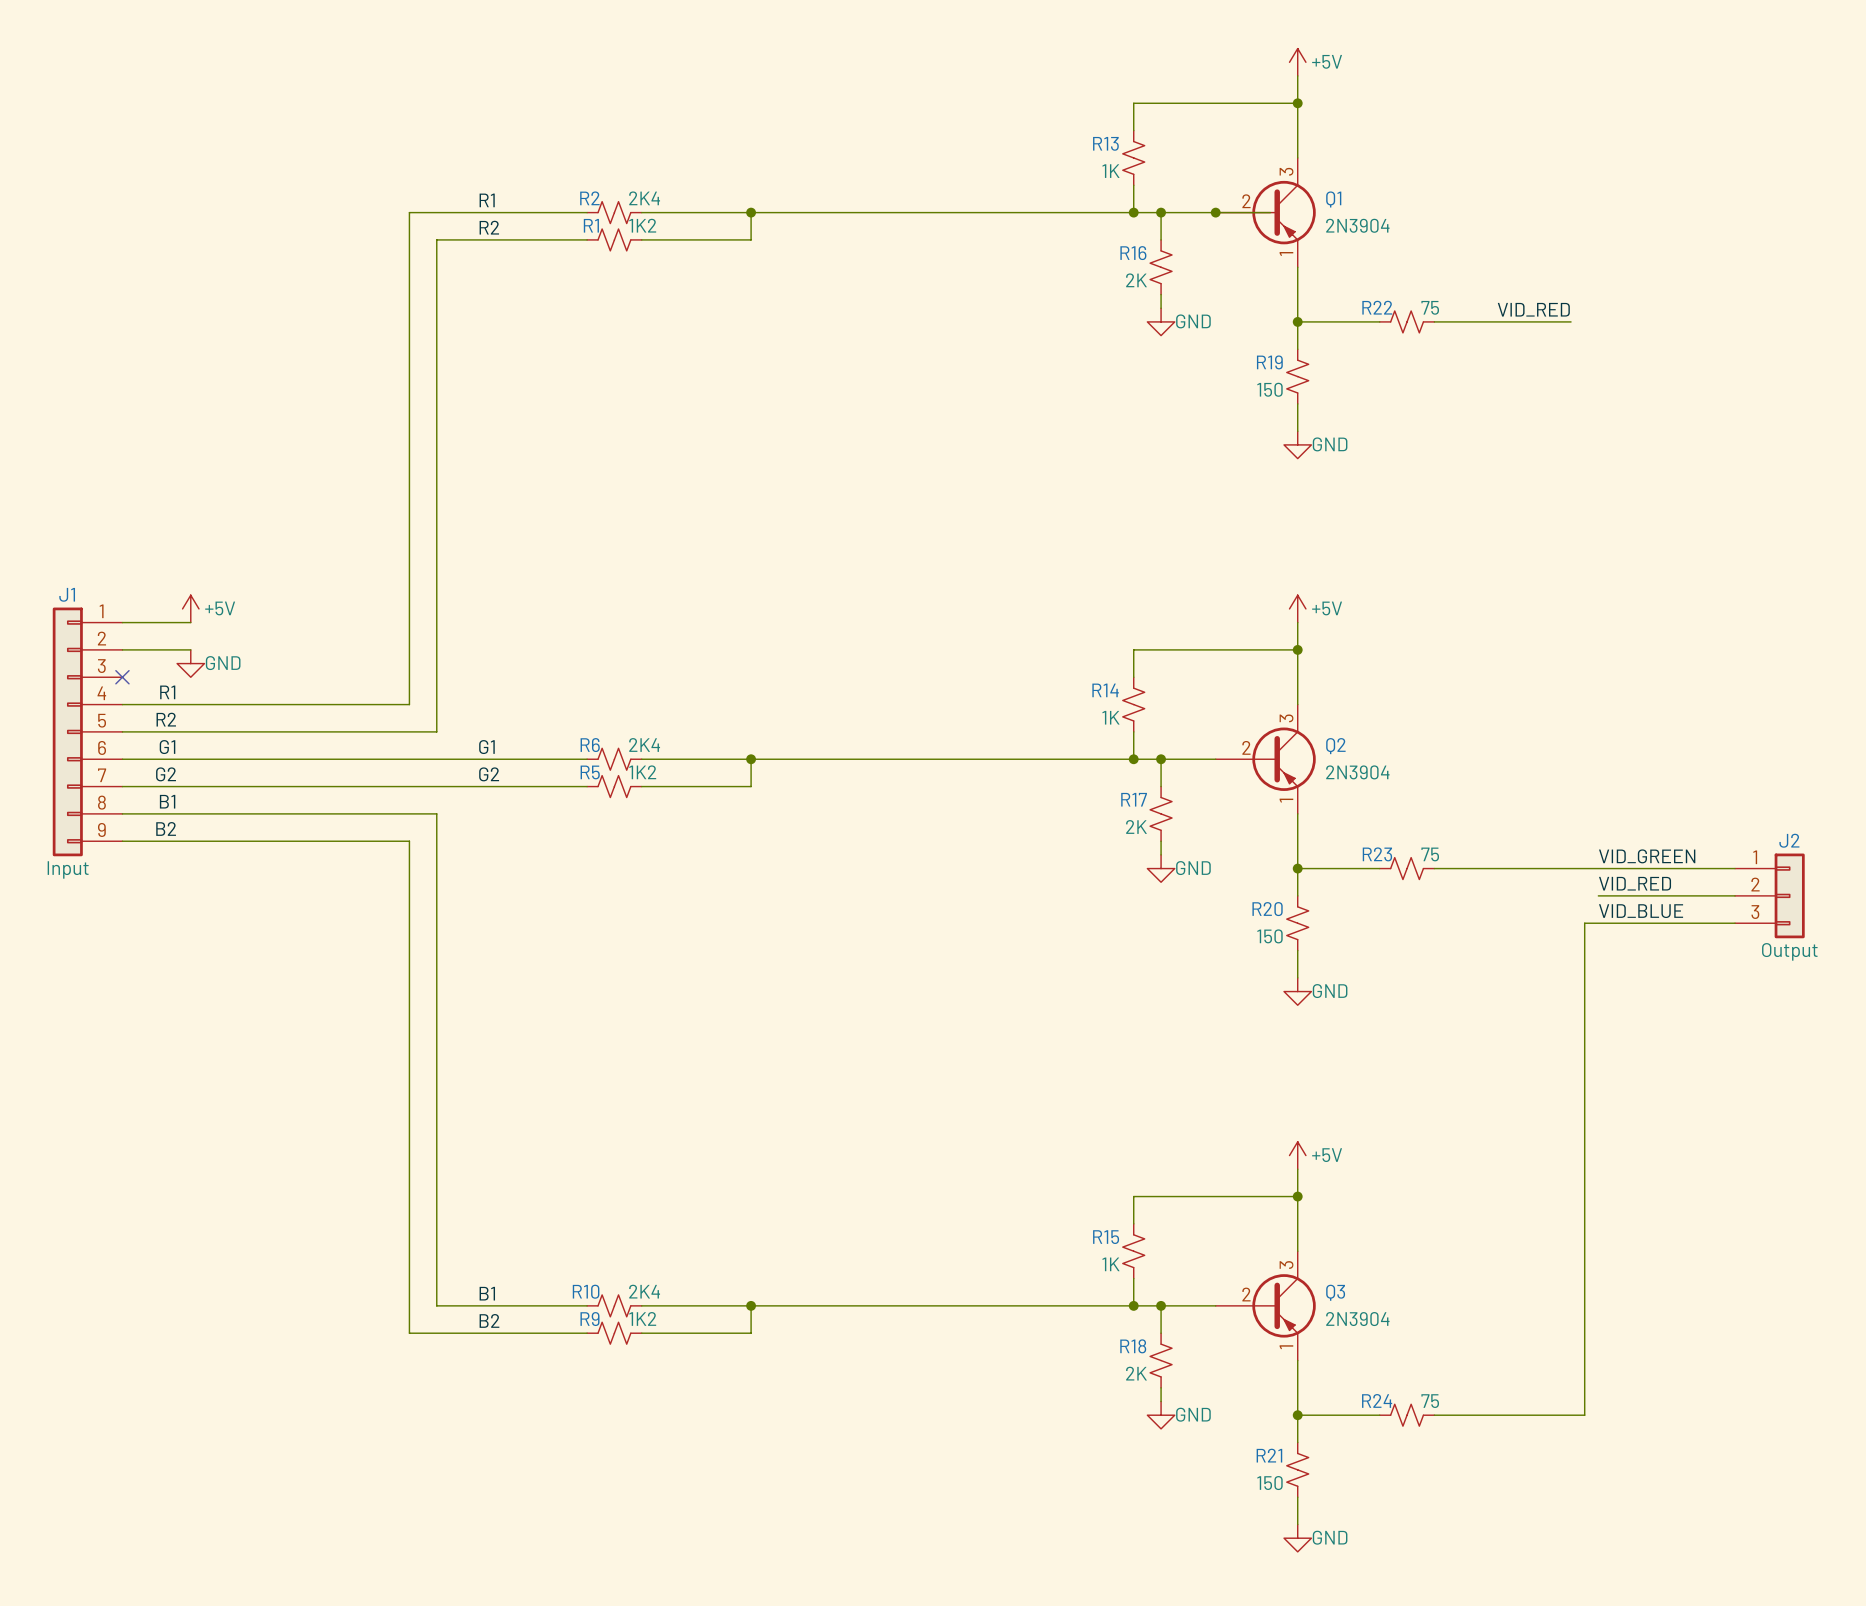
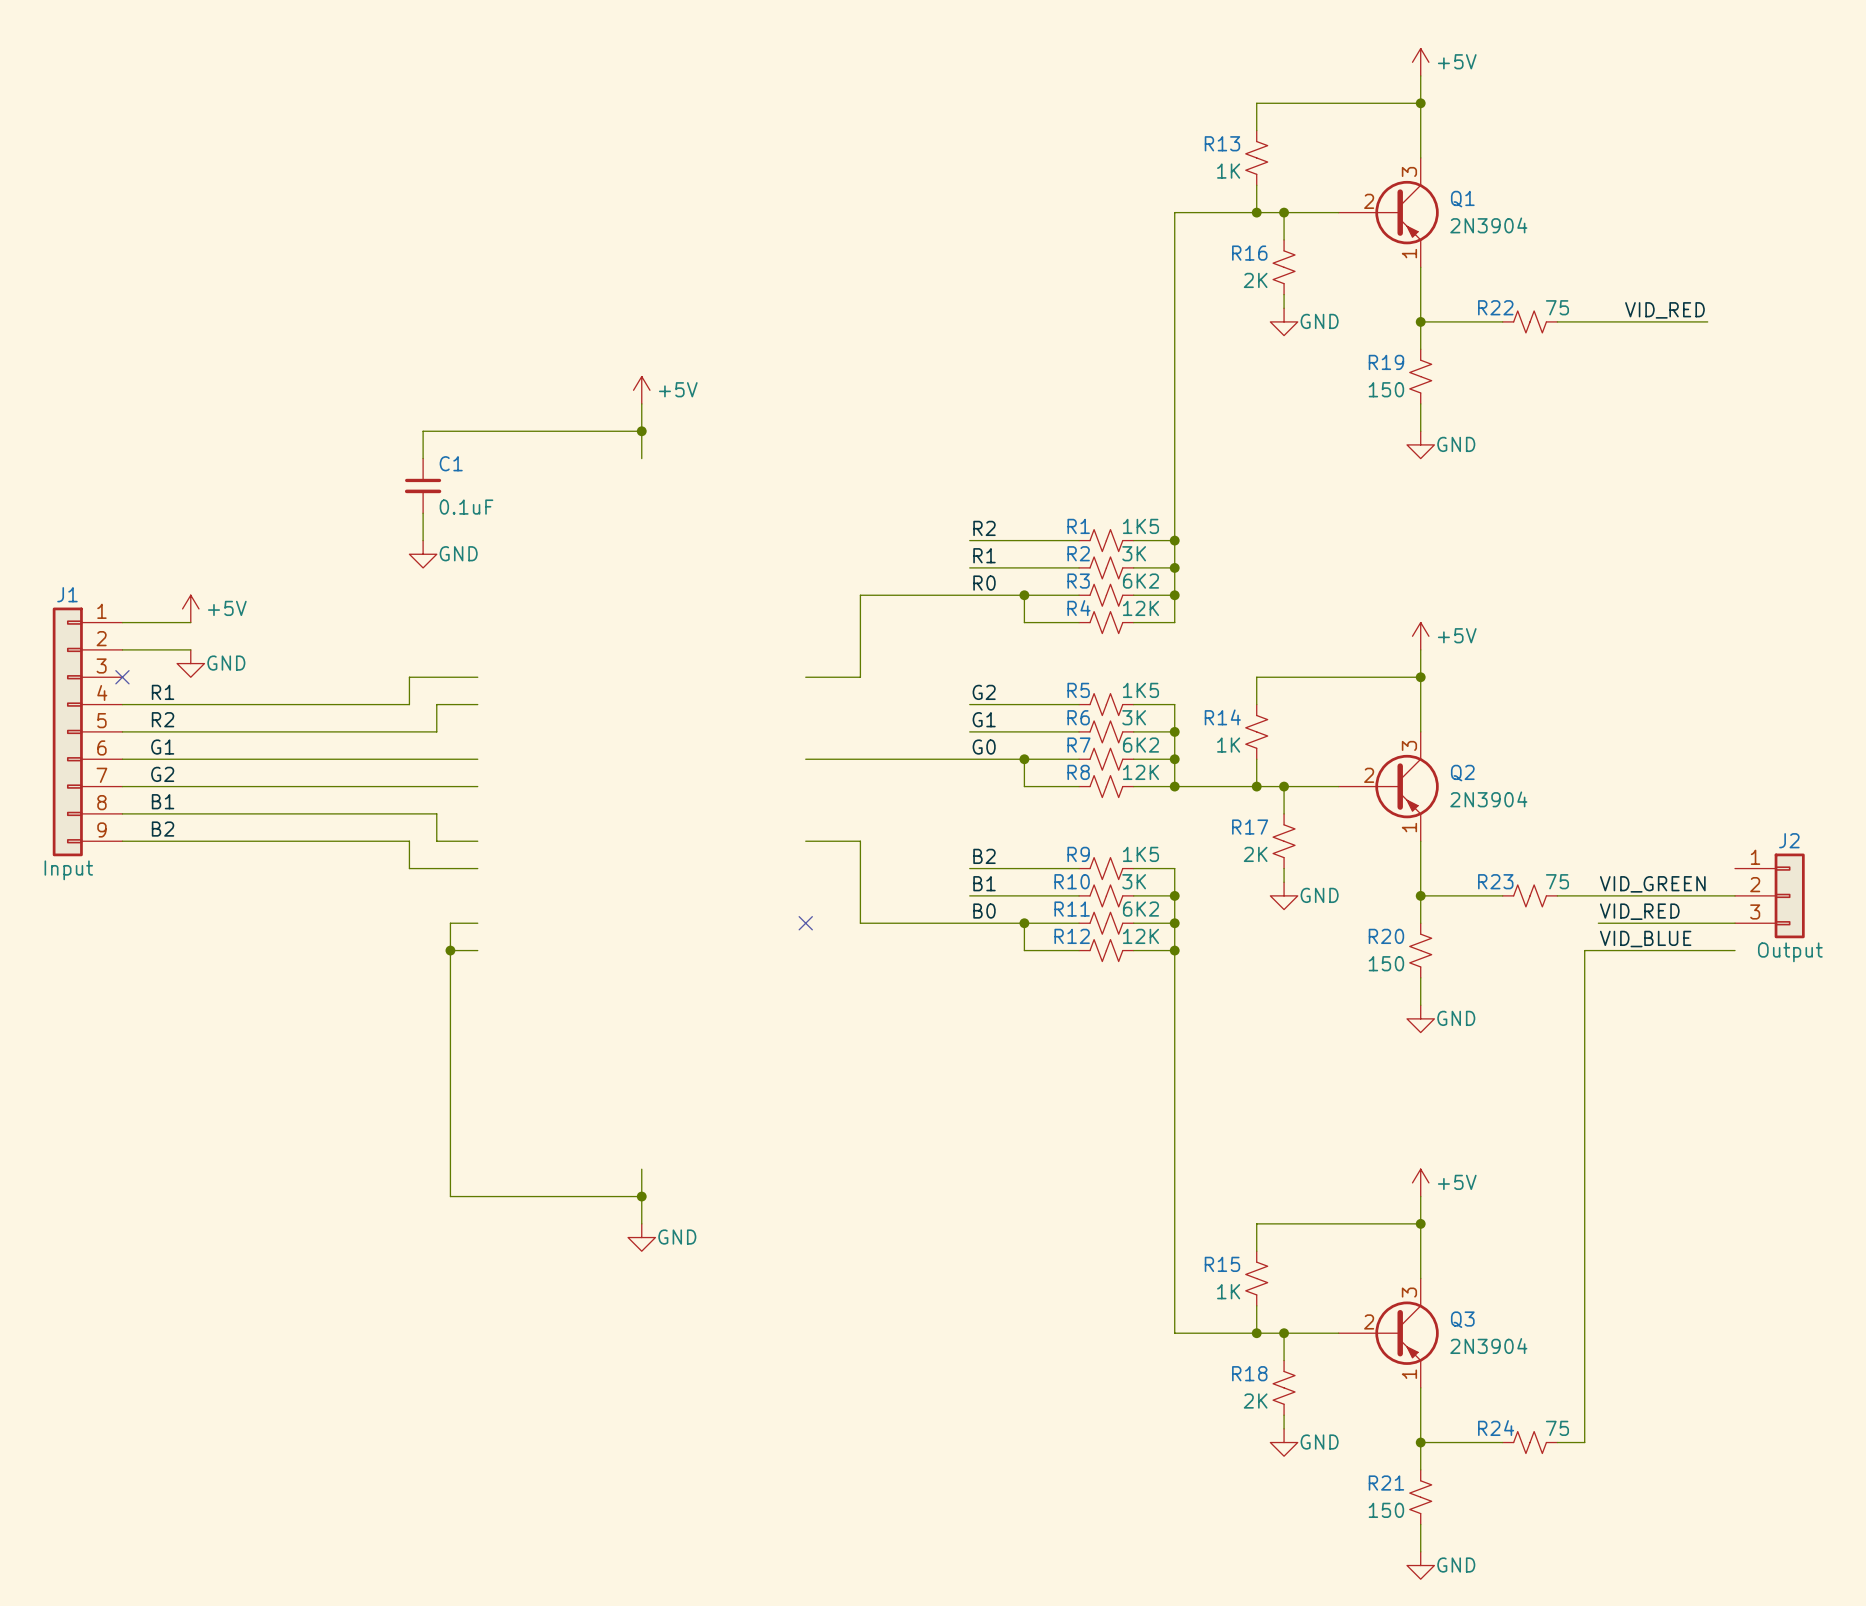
power symbol position: +5V (1297, 62) -> +5V (1420, 62)
wire: (1297, 75) (1297, 157) -> (1420, 75) (1420, 157)
wire: (1256, 103) (1133, 103) (1133, 130) -> (1256, 103) (1256, 130)
wire: none -> (1297, 103) (1420, 103)
junction: (1297, 103) -> none
junction: none -> (1420, 103)
R13 position: (1133, 157) -> (1256, 157)
wire: (1133, 185) (1133, 212) -> (1256, 185) (1256, 212)
R2 value: 2K4 (644, 198) -> 3K (1134, 553)
label: R1 (487, 200) -> none
wire: (587, 212) (409, 212) (409, 677) -> (477, 677) (409, 677)
R2 position: (614, 212) -> (1106, 567)
wire: (641, 212) (1174, 212) -> (1133, 622) (1174, 622) (1174, 212)
wire: (751, 212) (751, 239) (641, 239) -> none
junction: (751, 212) -> none
junction: (1133, 212) -> none
wire: (1161, 212) (1161, 239) -> (1284, 212) (1284, 239)
junction: (1161, 212) -> none
junction: (1215, 212) -> none
junction: none -> (1256, 212)
Q1 position: (1265, 212) -> (1388, 212)
wire: none -> (1270, 212) (1338, 212)
junction: none -> (1284, 212)
R1 value: 1K2 (642, 225) -> 1K5 (1140, 526)
label: R2 (489, 227) -> none
wire: (587, 239) (436, 239) (436, 704) -> (477, 704) (436, 704)
R1 position: (614, 239) -> (1106, 540)
R16 position: (1161, 267) -> (1284, 267)
wire: (1297, 267) (1297, 349) -> (1420, 267) (1420, 349)
wire: (1161, 294) (1161, 308) -> (1284, 294) (1284, 308)
label position: VID_RED (1533, 309) -> VID_RED (1664, 310)
power symbol: GND (1161, 321) -> none
power symbol: none -> GND (1284, 321)
wire: (1297, 321) (1379, 321) -> none
junction: (1297, 321) -> none
R22 position: (1407, 321) -> (1530, 321)
junction: none -> (1420, 321)
wire: none -> (1571, 321) (1707, 321)
R19 position: (1297, 376) -> (1420, 376)
power symbol: none -> +5V (641, 390)
wire: none -> (641, 403) (641, 458)
wire: (1297, 403) (1297, 431) -> (1420, 403) (1420, 431)
wire: none -> (641, 431) (423, 431) (423, 458)
junction: none -> (641, 431)
power symbol: GND (1297, 444) -> none
power symbol: none -> GND (1420, 444)
C1: none -> 0.1uF (423, 485)
wire: none -> (423, 513) (423, 540)
label: none -> R2 (984, 528)
wire: none -> (969, 540) (1079, 540)
wire: none -> (1133, 540) (1174, 540)
junction: none -> (1174, 540)
power symbol: none -> GND (423, 554)
label: none -> R1 (984, 555)
wire: none -> (969, 567) (1079, 567)
junction: none -> (1174, 567)
label: none -> R0 (984, 583)
wire: none -> (1024, 595) (1024, 622) (1079, 622)
junction: none -> (1024, 595)
wire: none -> (1079, 595) (860, 595) (860, 677) (805, 677)
R3: none -> 6K2 (1106, 595)
wire: none -> (1133, 595) (1174, 595)
junction: none -> (1174, 595)
power symbol position: +5V (1297, 608) -> +5V (1420, 636)
R4: none -> 12K (1106, 622)
wire: (1297, 622) (1297, 704) -> (1420, 649) (1420, 731)
wire: (1297, 649) (1133, 649) (1133, 677) -> (1420, 677) (1256, 677) (1256, 704)
junction: (1297, 649) -> none
junction: none -> (1420, 677)
label: none -> G2 (984, 692)
wire: none -> (969, 704) (1079, 704)
wire: none -> (1133, 704) (1174, 704) (1174, 786)
R14 position: (1133, 704) -> (1256, 731)
label: none -> G1 (984, 719)
wire: none -> (969, 731) (1079, 731)
wire: (1133, 731) (1133, 759) (1079, 759) -> (1133, 731) (1174, 731)
junction: none -> (1174, 731)
R6 value: 2K4 (644, 744) -> 3K (1134, 717)
label: G1 (486, 747) -> none
label: none -> G0 (984, 747)
wire: (477, 759) (587, 759) -> none
R6 position: (614, 759) -> (1106, 731)
wire: (641, 759) (805, 759) -> none
wire: (751, 759) (751, 786) (641, 786) -> none
junction: (751, 759) -> none
wire: none -> (1024, 759) (1024, 786) (1079, 786)
junction: none -> (1024, 759)
R7: none -> 6K2 (1106, 759)
junction: (1133, 759) -> none
wire: (1161, 759) (1161, 786) -> (1284, 786) (1284, 813)
junction position: (1161, 759) -> (1174, 759)
wire: (1174, 759) (1215, 759) -> (1133, 567) (1174, 567)
wire: none -> (1256, 759) (1256, 786)
Q2 position: (1265, 759) -> (1388, 786)
R5 value: 1K2 (642, 772) -> 1K5 (1140, 690)
label: G2 (489, 774) -> none
wire: (477, 786) (587, 786) -> none
R5 position: (614, 786) -> (1106, 704)
R8: none -> 12K (1106, 786)
wire: none -> (1133, 786) (1338, 786)
junction: none -> (1174, 786)
junction: none -> (1256, 786)
junction: none -> (1284, 786)
R17 position: (1161, 813) -> (1284, 841)
wire: (1297, 813) (1297, 895) -> (1420, 841) (1420, 923)
wire: (436, 841) (436, 1305) (587, 1305) -> (436, 841) (477, 841)
wire: none -> (805, 841) (860, 841) (860, 923) (1079, 923)
wire: (1161, 841) (1161, 854) -> (1284, 868) (1284, 882)
label: none -> B2 (984, 856)
label: VID_GREEN (1647, 856) -> none
wire: (409, 868) (409, 1333) (587, 1333) -> (409, 868) (477, 868)
wire: none -> (969, 868) (1079, 868)
wire: none -> (1133, 868) (1174, 868) (1174, 1333) (1338, 1333)
power symbol: GND (1161, 868) -> none
wire: (1297, 868) (1379, 868) -> (1420, 895) (1502, 895)
junction: (1297, 868) -> none
R23 position: (1407, 868) -> (1530, 895)
wire: (1434, 868) (1735, 868) -> none
label: none -> B1 (984, 883)
label: VID_RED (1635, 883) -> VID_GREEN (1652, 884)
wire: none -> (969, 895) (1079, 895)
wire: none -> (1133, 895) (1174, 895)
junction: none -> (1174, 895)
power symbol: none -> GND (1284, 895)
junction: none -> (1420, 895)
wire: none -> (1557, 895) (1598, 895)
label: none -> B0 (984, 911)
label: VID_BLUE (1641, 911) -> VID_RED (1639, 911)
wire: none -> (477, 923) (450, 923) (450, 1196) (641, 1196)
no-connect mark: none -> (805, 923)
wire: none -> (1024, 923) (1024, 950) (1079, 950)
junction: none -> (1024, 923)
R11: none -> 6K2 (1106, 923)
wire: none -> (1133, 923) (1174, 923)
junction: none -> (1174, 923)
R20 position: (1297, 923) -> (1420, 950)
wire: (1598, 923) (1584, 923) (1584, 950) -> (1735, 950) (1584, 950)
label: none -> VID_BLUE (1645, 939)
wire: none -> (450, 950) (477, 950)
junction: none -> (450, 950)
R12: none -> 12K (1106, 950)
wire: none -> (1133, 950) (1174, 950)
junction: none -> (1174, 950)
wire: (1297, 950) (1297, 977) -> (1420, 977) (1420, 1005)
power symbol: GND (1297, 991) -> none
power symbol: none -> GND (1420, 1018)
power symbol position: +5V (1297, 1155) -> +5V (1420, 1182)
wire: none -> (641, 1169) (641, 1223)
wire: (1297, 1169) (1297, 1251) -> (1420, 1196) (1420, 1278)
junction: none -> (641, 1196)
wire: (1297, 1196) (1133, 1196) (1133, 1223) -> (1420, 1223) (1256, 1223) (1256, 1251)
junction: (1297, 1196) -> none
junction: none -> (1420, 1223)
power symbol: none -> GND (641, 1237)
R15 position: (1133, 1251) -> (1256, 1278)
wire: (1133, 1278) (1133, 1305) -> (1256, 1305) (1256, 1333)
R10 value: 2K4 (644, 1291) -> 3K (1134, 881)
label: B1 (487, 1293) -> none
R10 position: (614, 1305) -> (1106, 895)
wire: (641, 1305) (1215, 1305) -> none
wire: (751, 1305) (751, 1333) (641, 1333) -> none
junction: (751, 1305) -> none
junction: (1133, 1305) -> none
wire: (1161, 1305) (1161, 1333) -> (1284, 1333) (1284, 1360)
junction: (1161, 1305) -> none
Q3 position: (1265, 1305) -> (1388, 1333)
R9 value: 1K2 (642, 1318) -> 1K5 (1140, 854)
label: B2 (489, 1320) -> none
R9 position: (614, 1333) -> (1106, 868)
junction: none -> (1256, 1333)
junction: none -> (1284, 1333)
R18 position: (1161, 1360) -> (1284, 1387)
wire: (1297, 1360) (1297, 1442) -> (1420, 1387) (1420, 1469)
wire: (1161, 1387) (1161, 1401) -> (1284, 1415) (1284, 1428)
power symbol: GND (1161, 1415) -> none
wire: (1297, 1415) (1379, 1415) -> (1420, 1442) (1502, 1442)
junction: (1297, 1415) -> none
R24 position: (1407, 1415) -> (1530, 1442)
wire: (1434, 1415) (1584, 1415) -> (1557, 1442) (1584, 1442) (1584, 1415)
power symbol: none -> GND (1284, 1442)
junction: none -> (1420, 1442)
R21 position: (1297, 1469) -> (1420, 1497)
wire: (1297, 1497) (1297, 1524) -> (1420, 1524) (1420, 1551)
power symbol: GND (1297, 1538) -> none
power symbol: none -> GND (1420, 1565)

